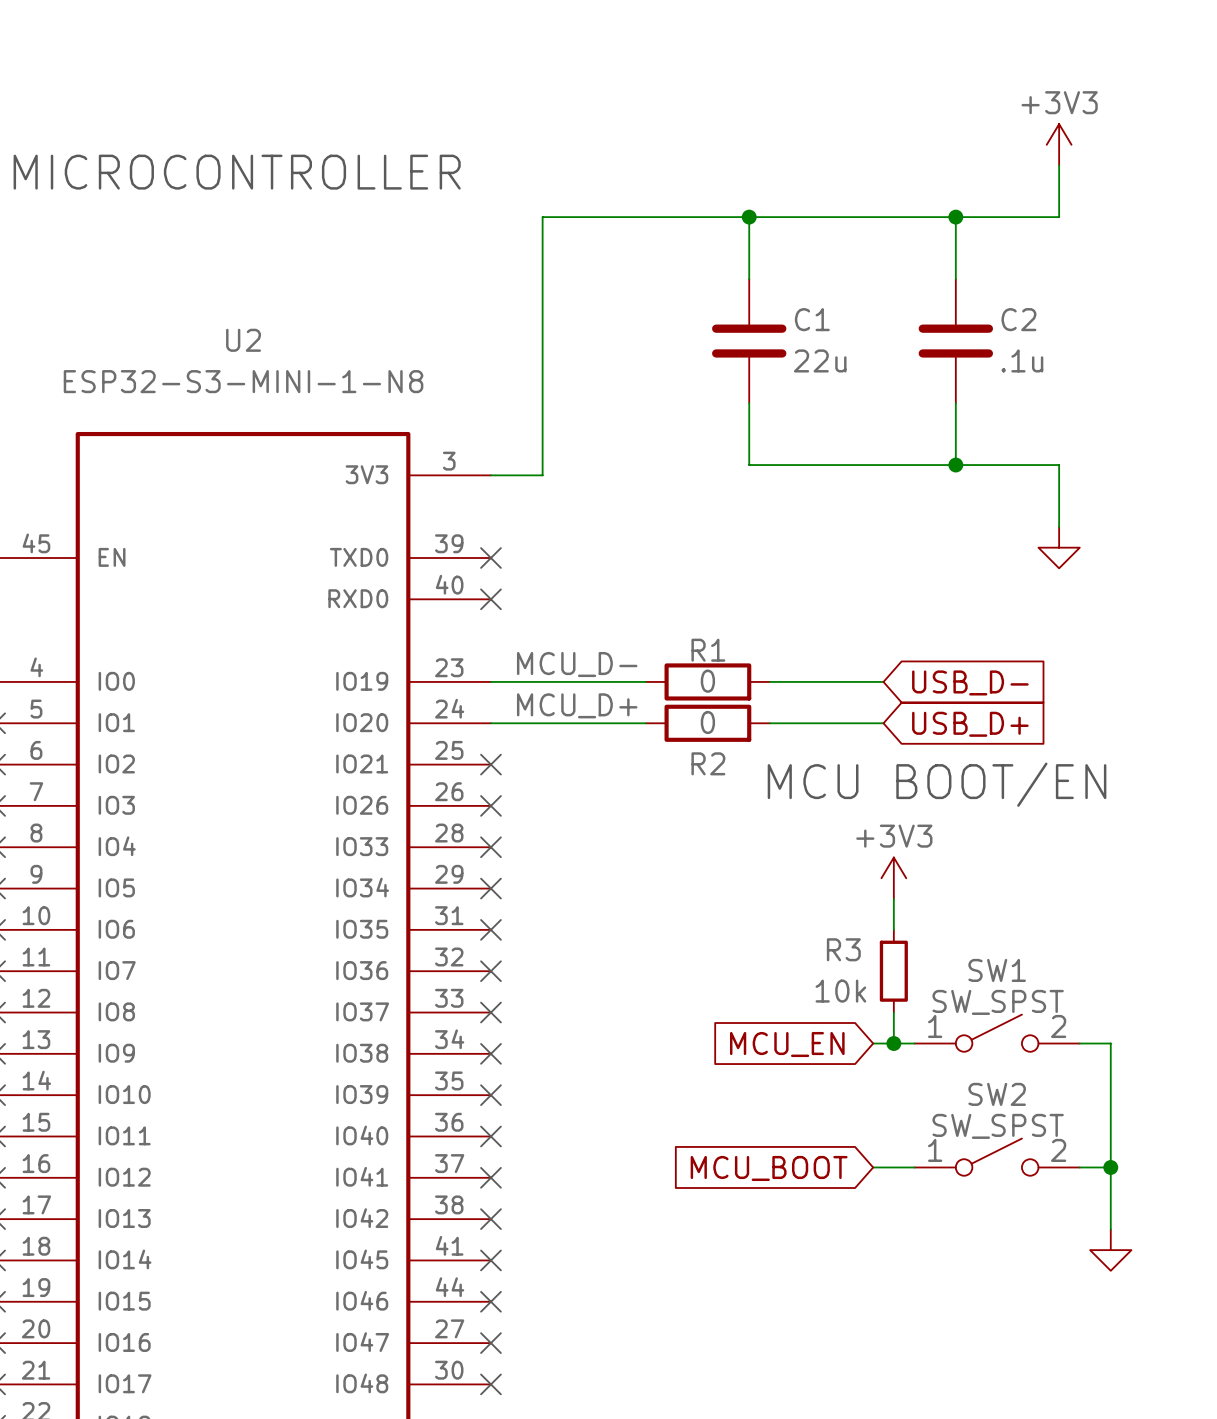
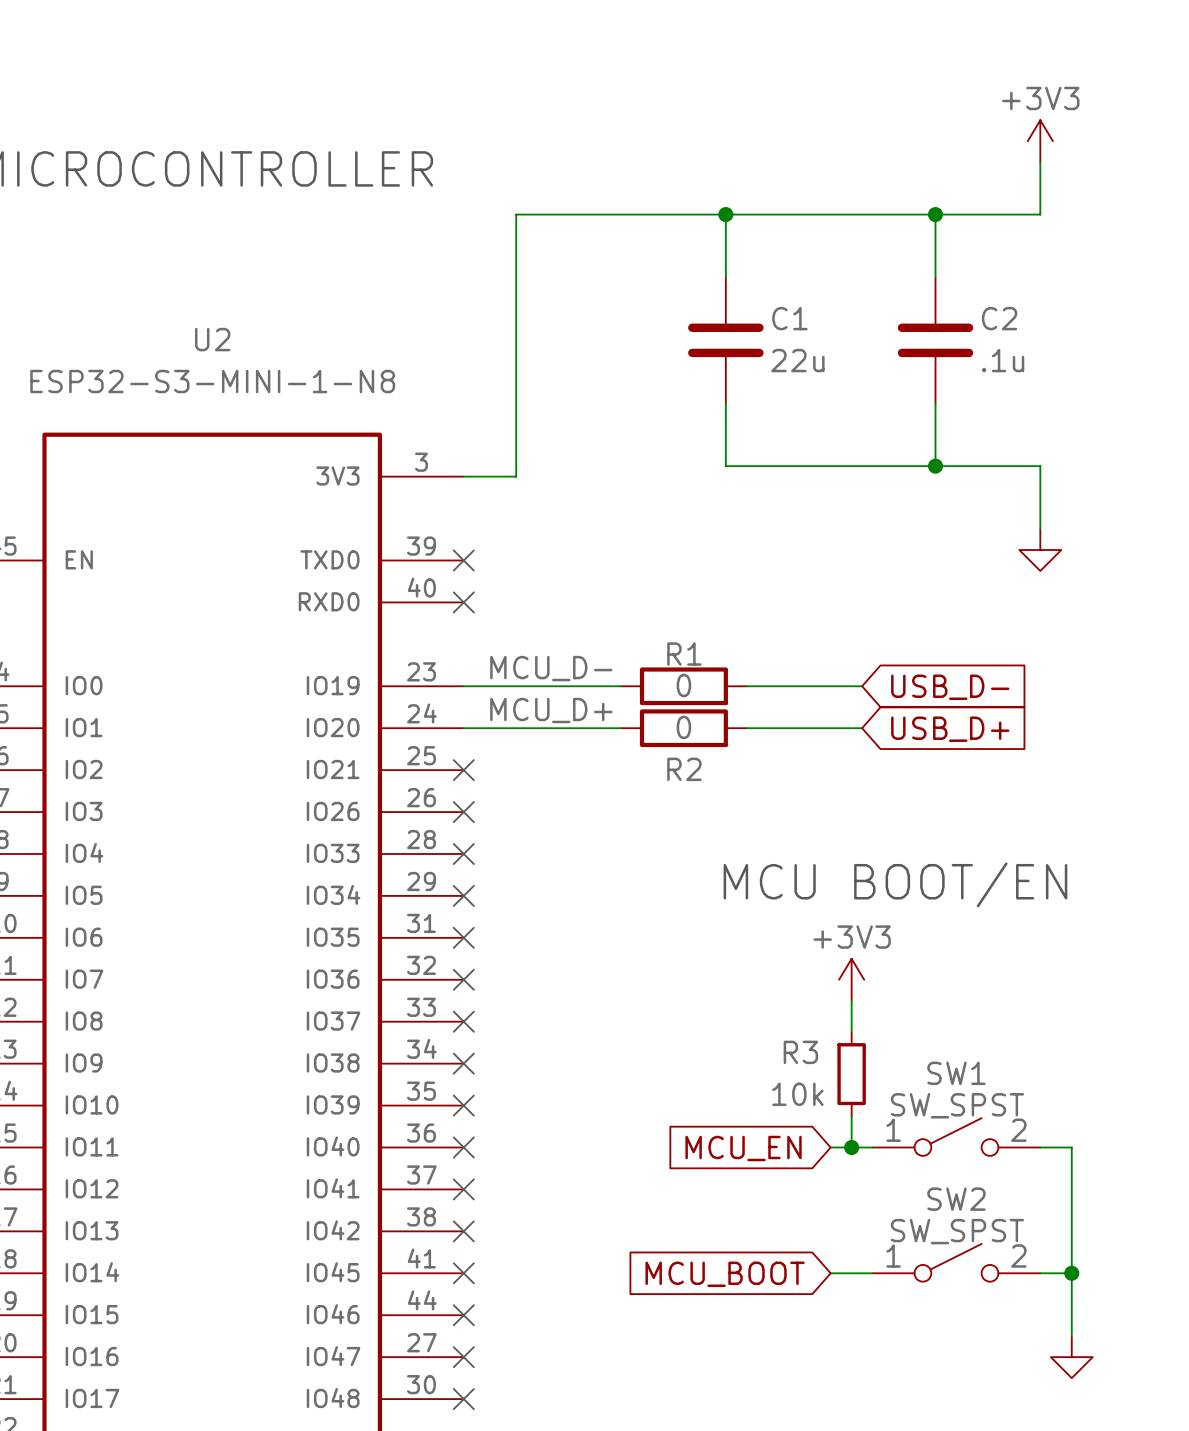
text position: MCU BOOT/EN (937, 784) -> MCU BOOT/EN (895, 884)
power symbol position: +3V3 (893, 878) -> +3V3 (851, 979)
wire: (893, 898) (893, 929) -> (851, 1000) (851, 1032)
R3 position: (893, 971) -> (851, 1074)
wire: (893, 1012) (893, 1043) -> (851, 1116) (851, 1147)
SW1 position: (997, 1033) -> (956, 1137)
wire: (873, 1043) (914, 1043) -> (830, 1147) (872, 1147)
junction position: (893, 1043) -> (851, 1147)
wire: (1079, 1043) (1110, 1043) (1110, 1229) -> (1040, 1147) (1071, 1147) (1071, 1336)
global label position: MCU_EN (787, 1044) -> MCU_EN (743, 1148)
SW2 position: (997, 1157) -> (956, 1262)
wire: (873, 1167) (914, 1167) -> (830, 1273) (872, 1273)
wire: (1079, 1167) (1110, 1167) -> (1040, 1273) (1071, 1273)
junction position: (1110, 1167) -> (1071, 1273)
global label position: MCU_BOOT (769, 1168) -> MCU_BOOT (725, 1274)
power symbol position: (1110, 1250) -> (1071, 1357)

